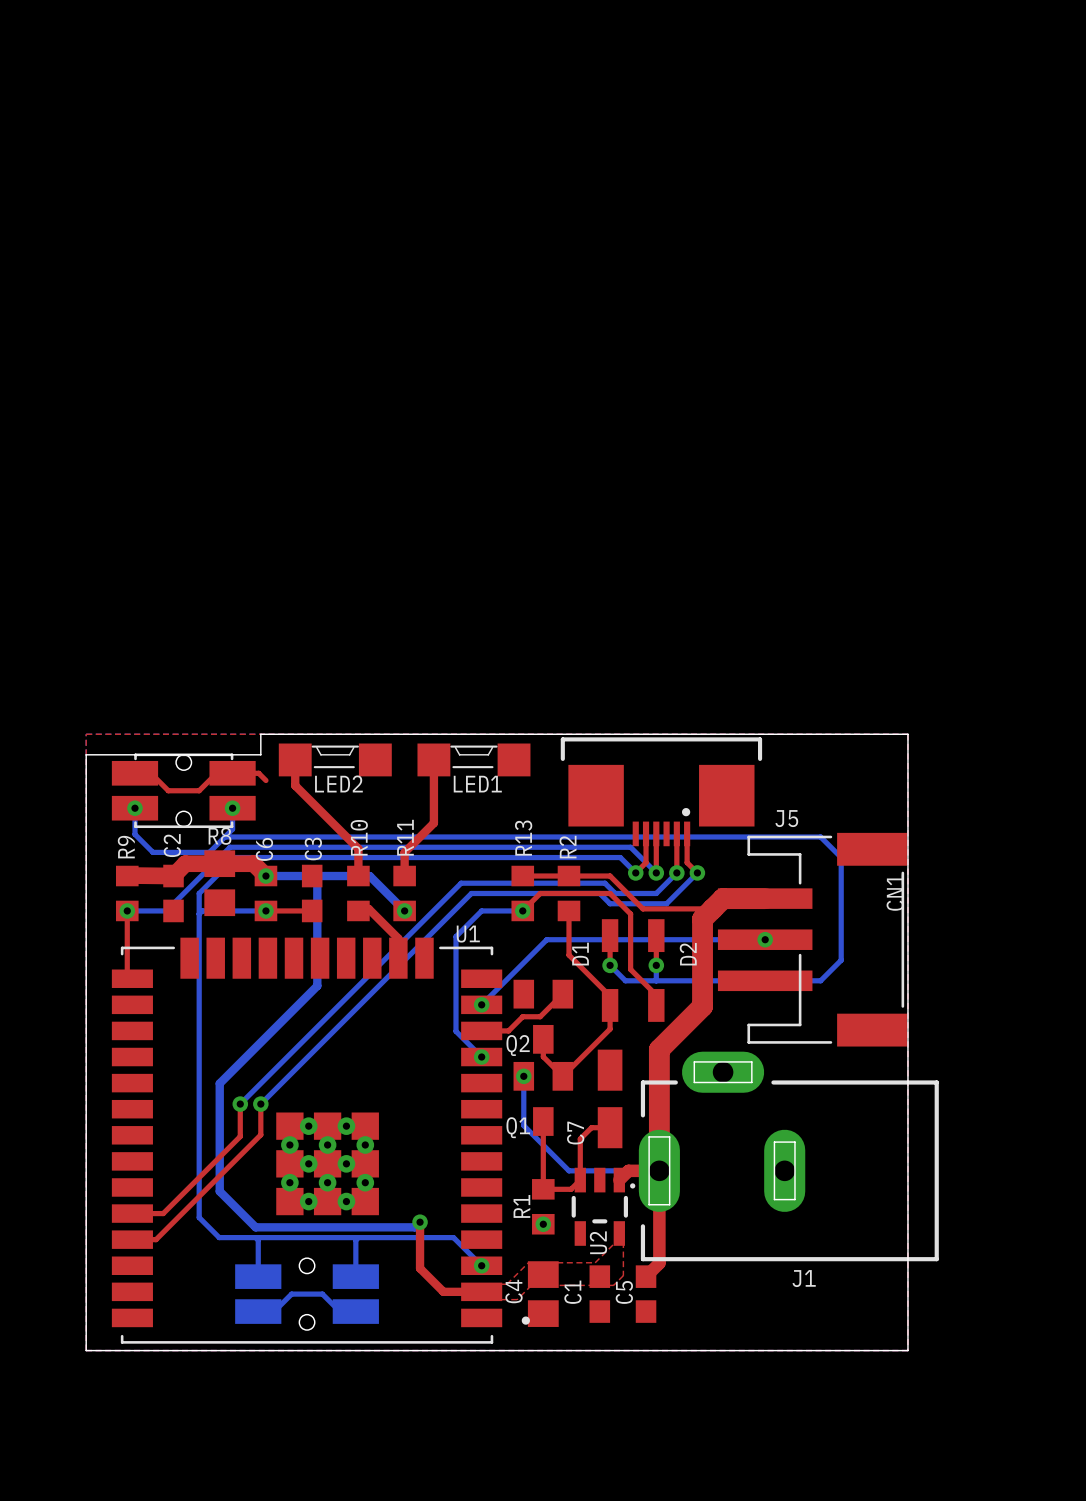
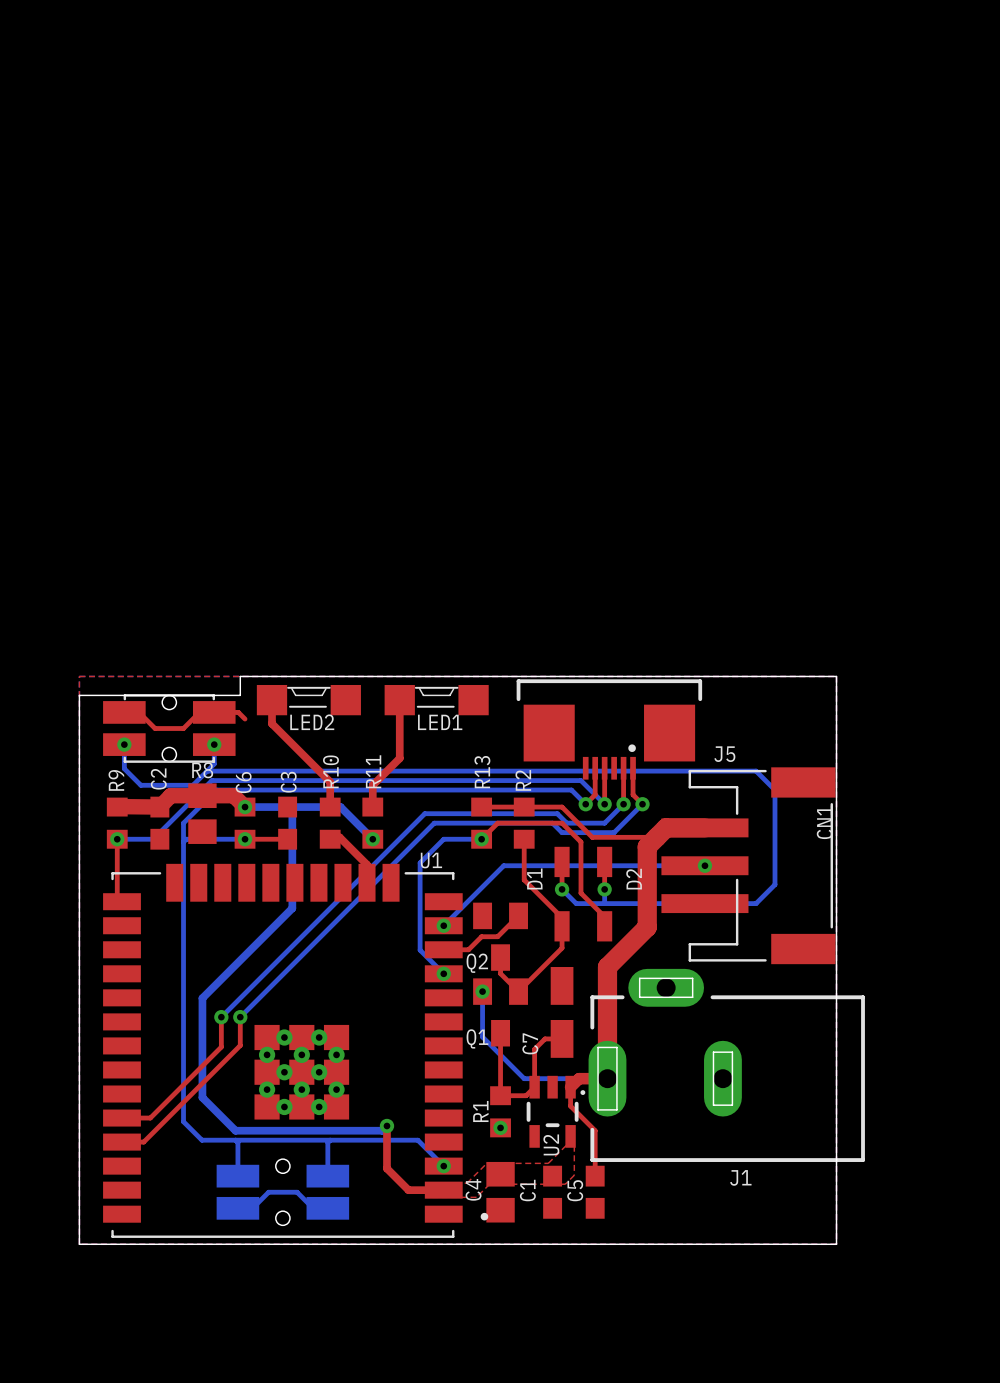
top track: (659, 1170) (659, 1263) (646, 1276) -> (570, 1087) (570, 1106) (595, 1130) (595, 1176)

